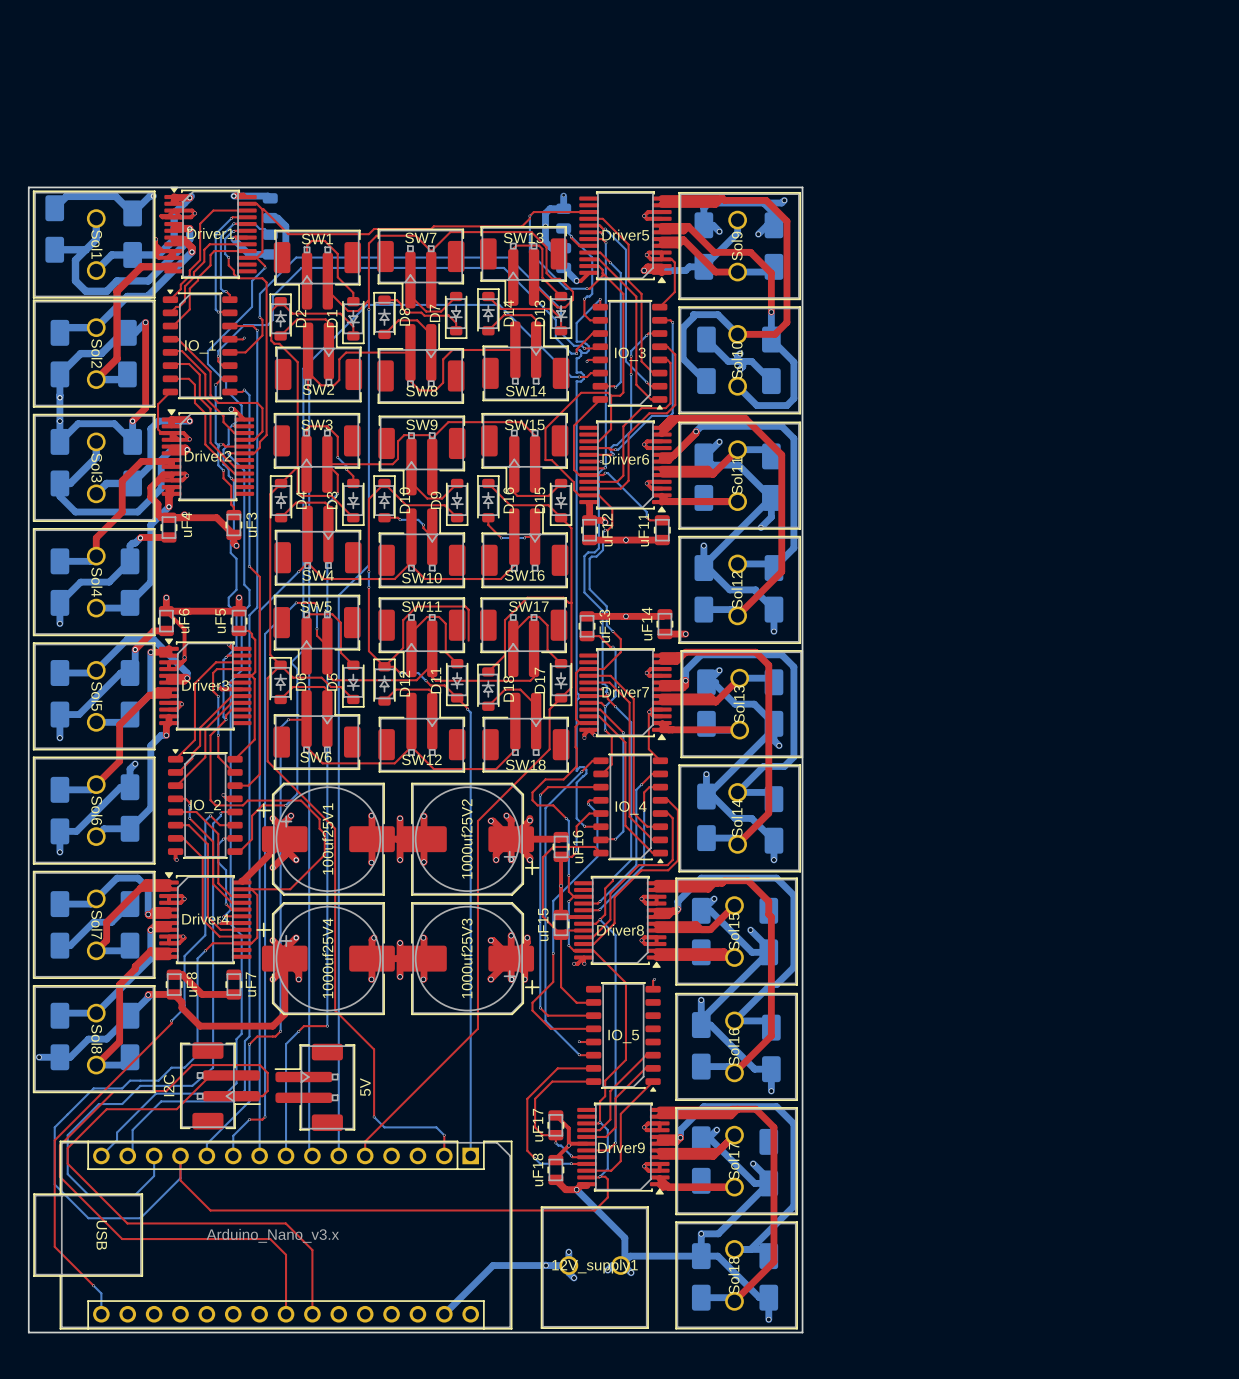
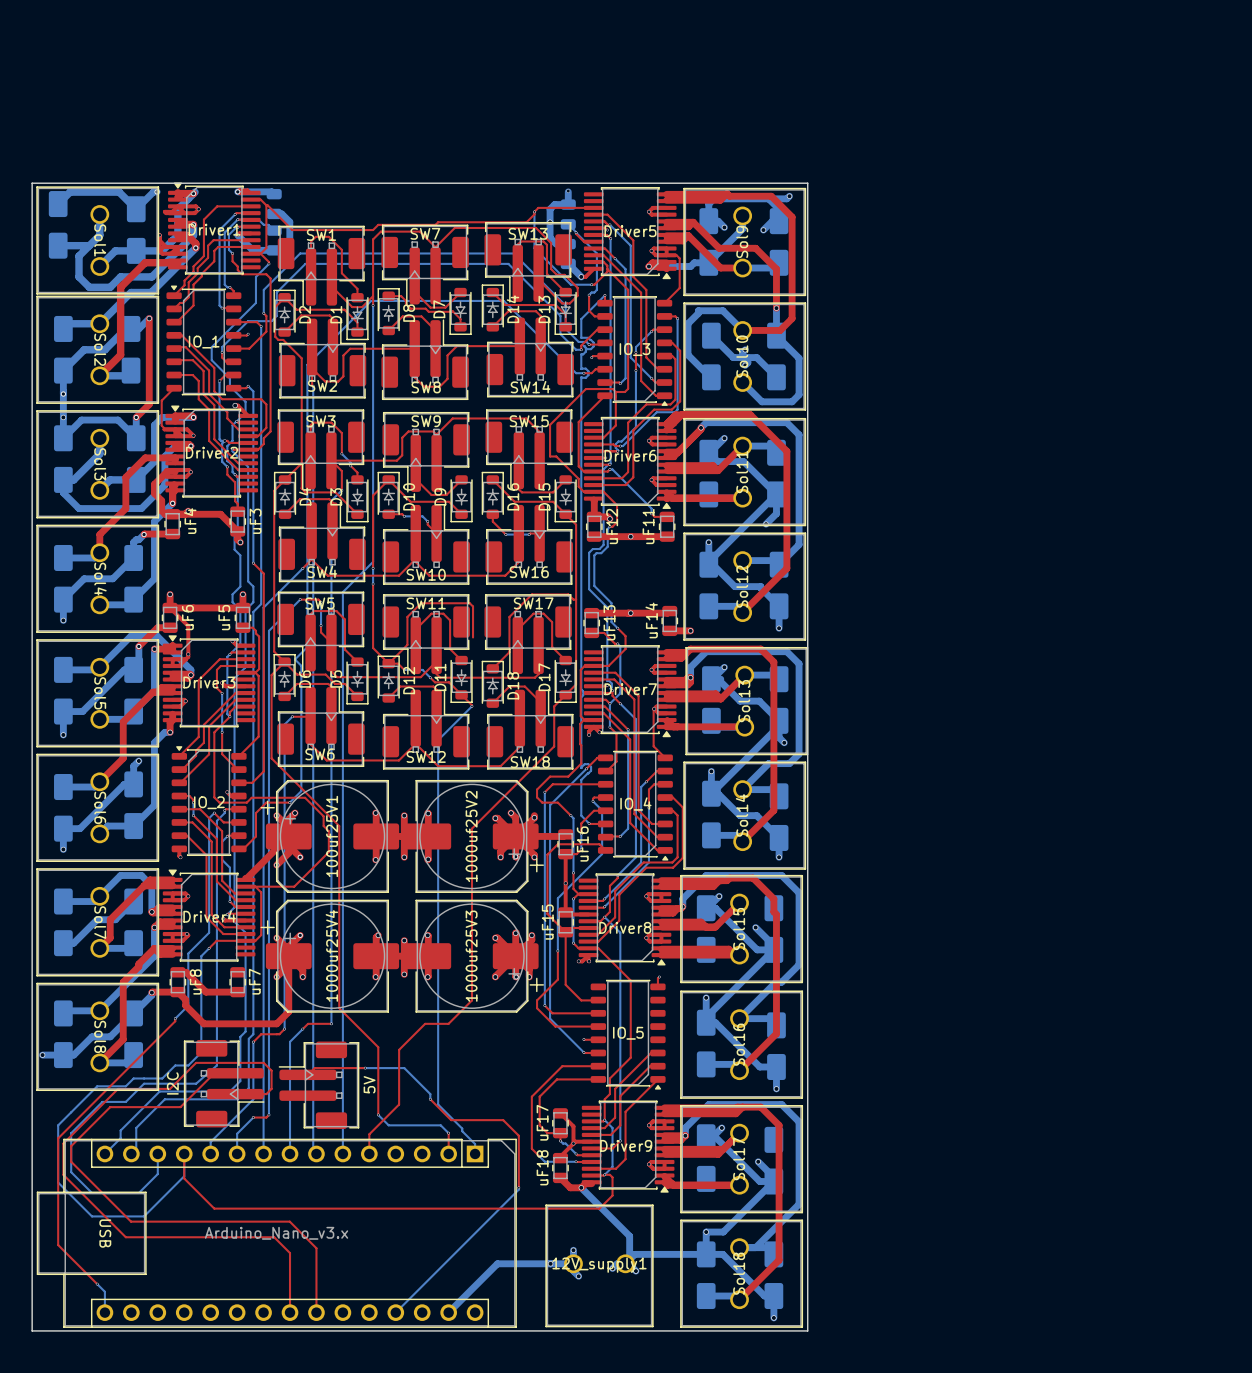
bottom track: (467, 709) (470, 712) (470, 1146) -> (471, 706) (438, 740) (438, 1104) (475, 1144)
top track: (477, 821) (477, 1028) (365, 1141) -> (482, 818) (471, 828) (471, 1000) (448, 1023) (425, 1023) (399, 1049) (399, 1104) (369, 1134) (369, 1139)
bottom track: none -> (365, 1068) (404, 1068) (430, 1094) (430, 1099)
top track: none -> (365, 1068) (314, 1068) (308, 1074)
via: none -> (365, 1068)
top track: none -> (430, 1099) (451, 1120) (503, 1120) (518, 1135) (518, 1187)
via: none -> (430, 1099)
bottom track: none -> (518, 1187) (395, 1312)
via: none -> (518, 1187)

